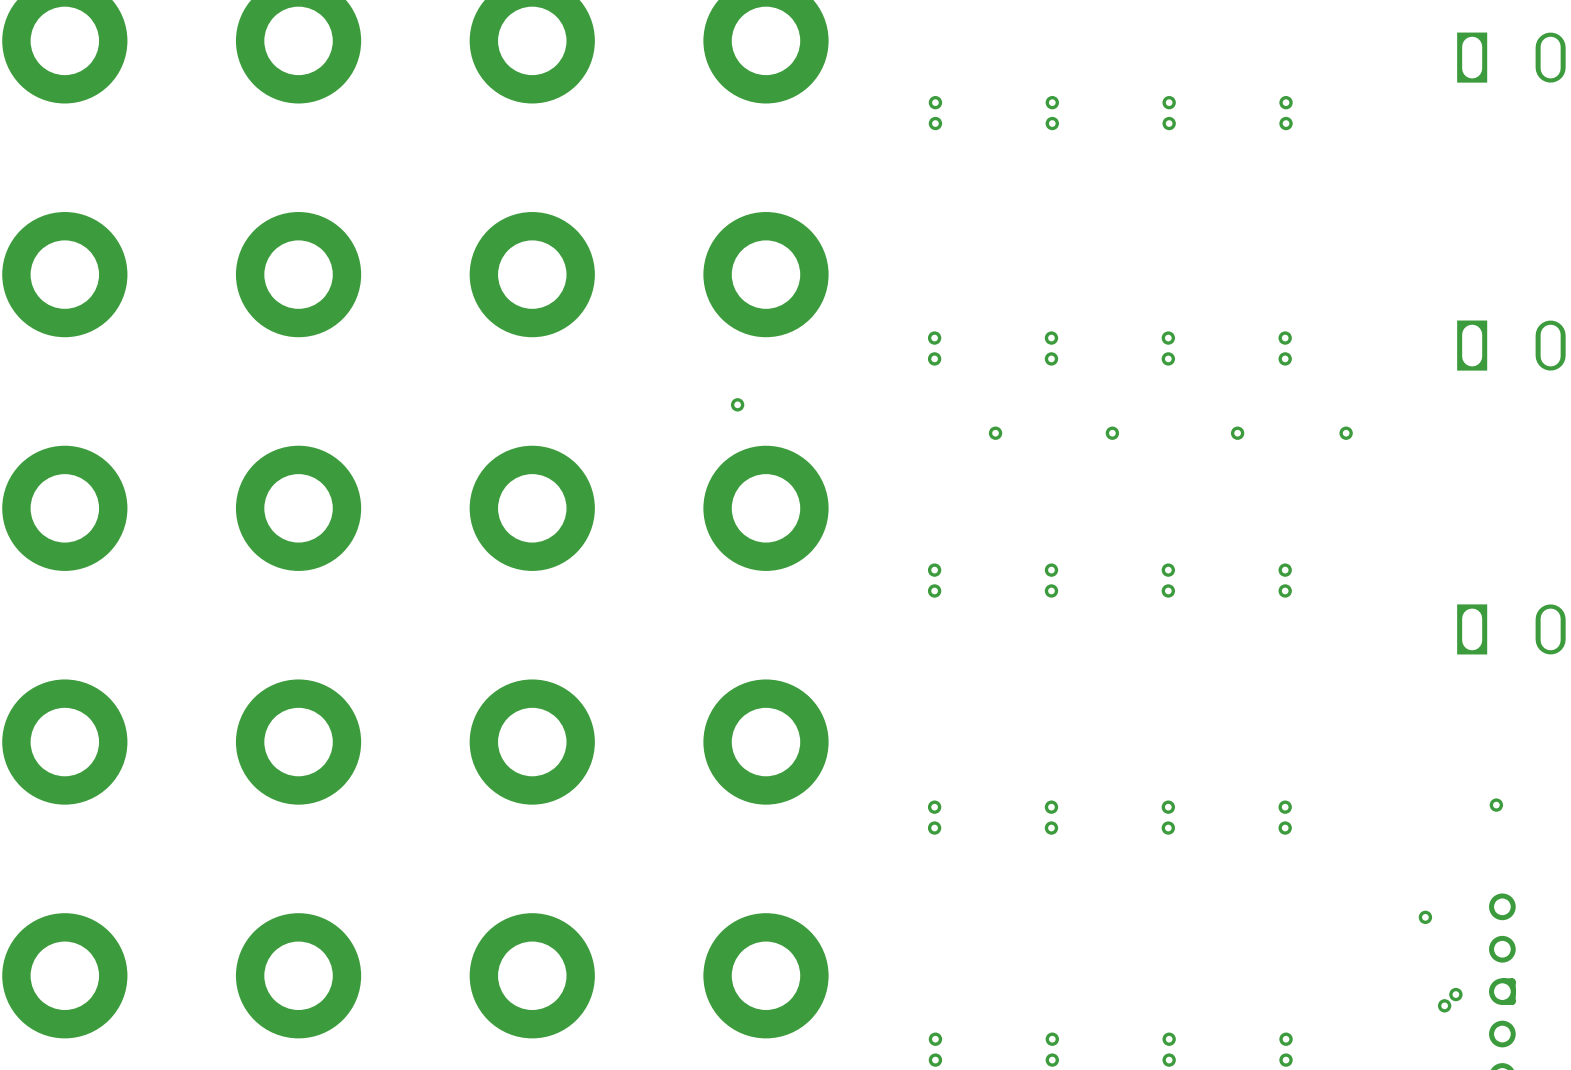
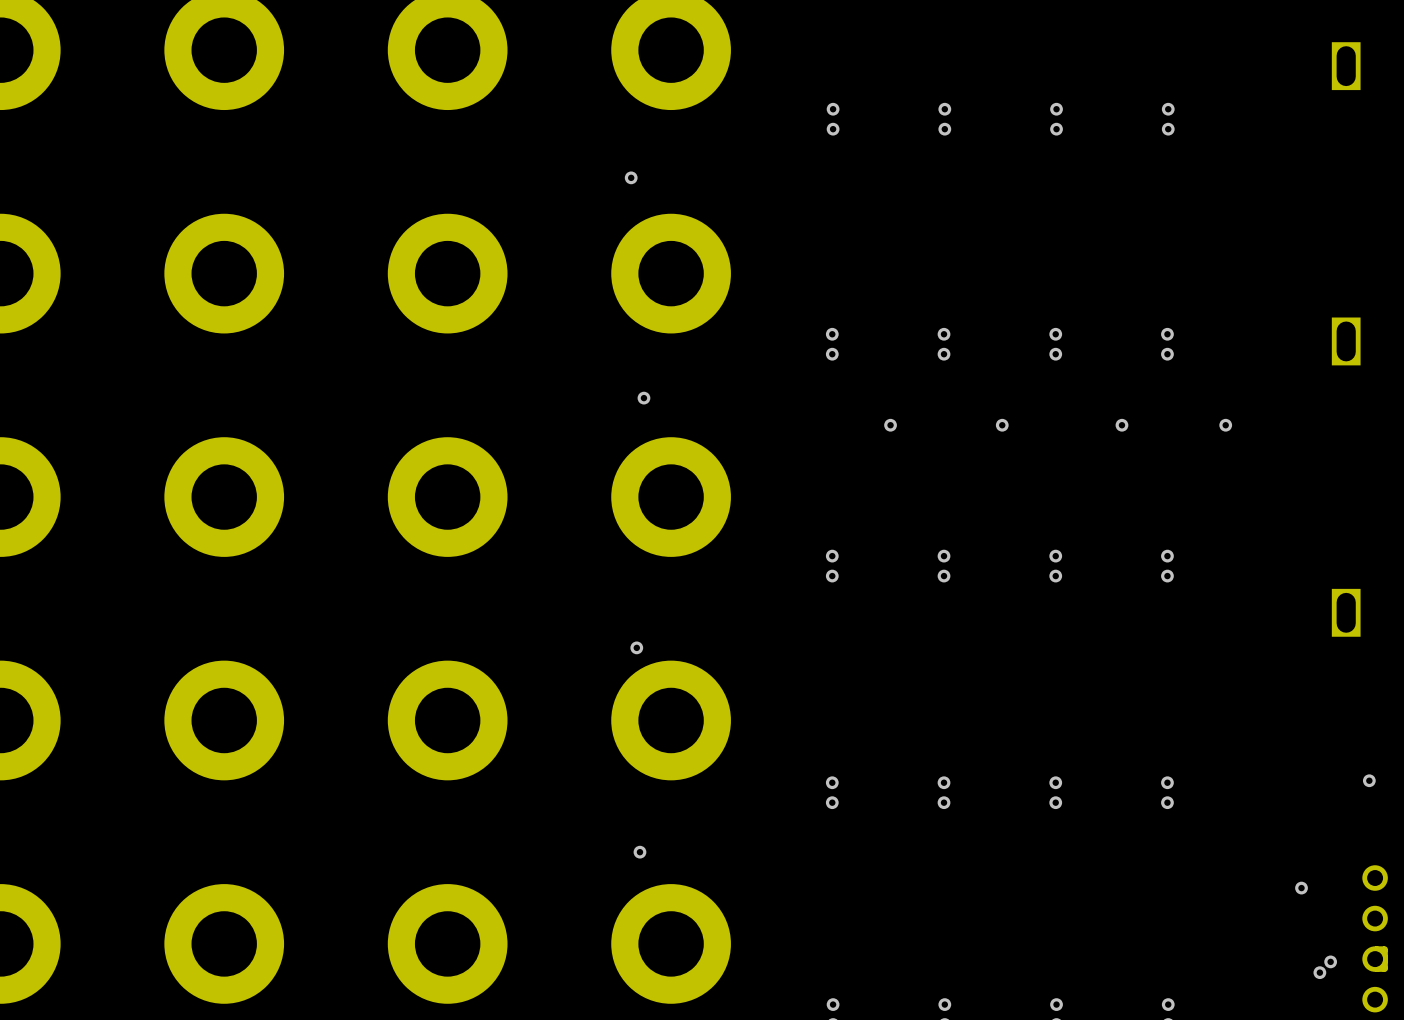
via: none -> (631, 177)
via: none -> (636, 647)
via: none -> (639, 852)

